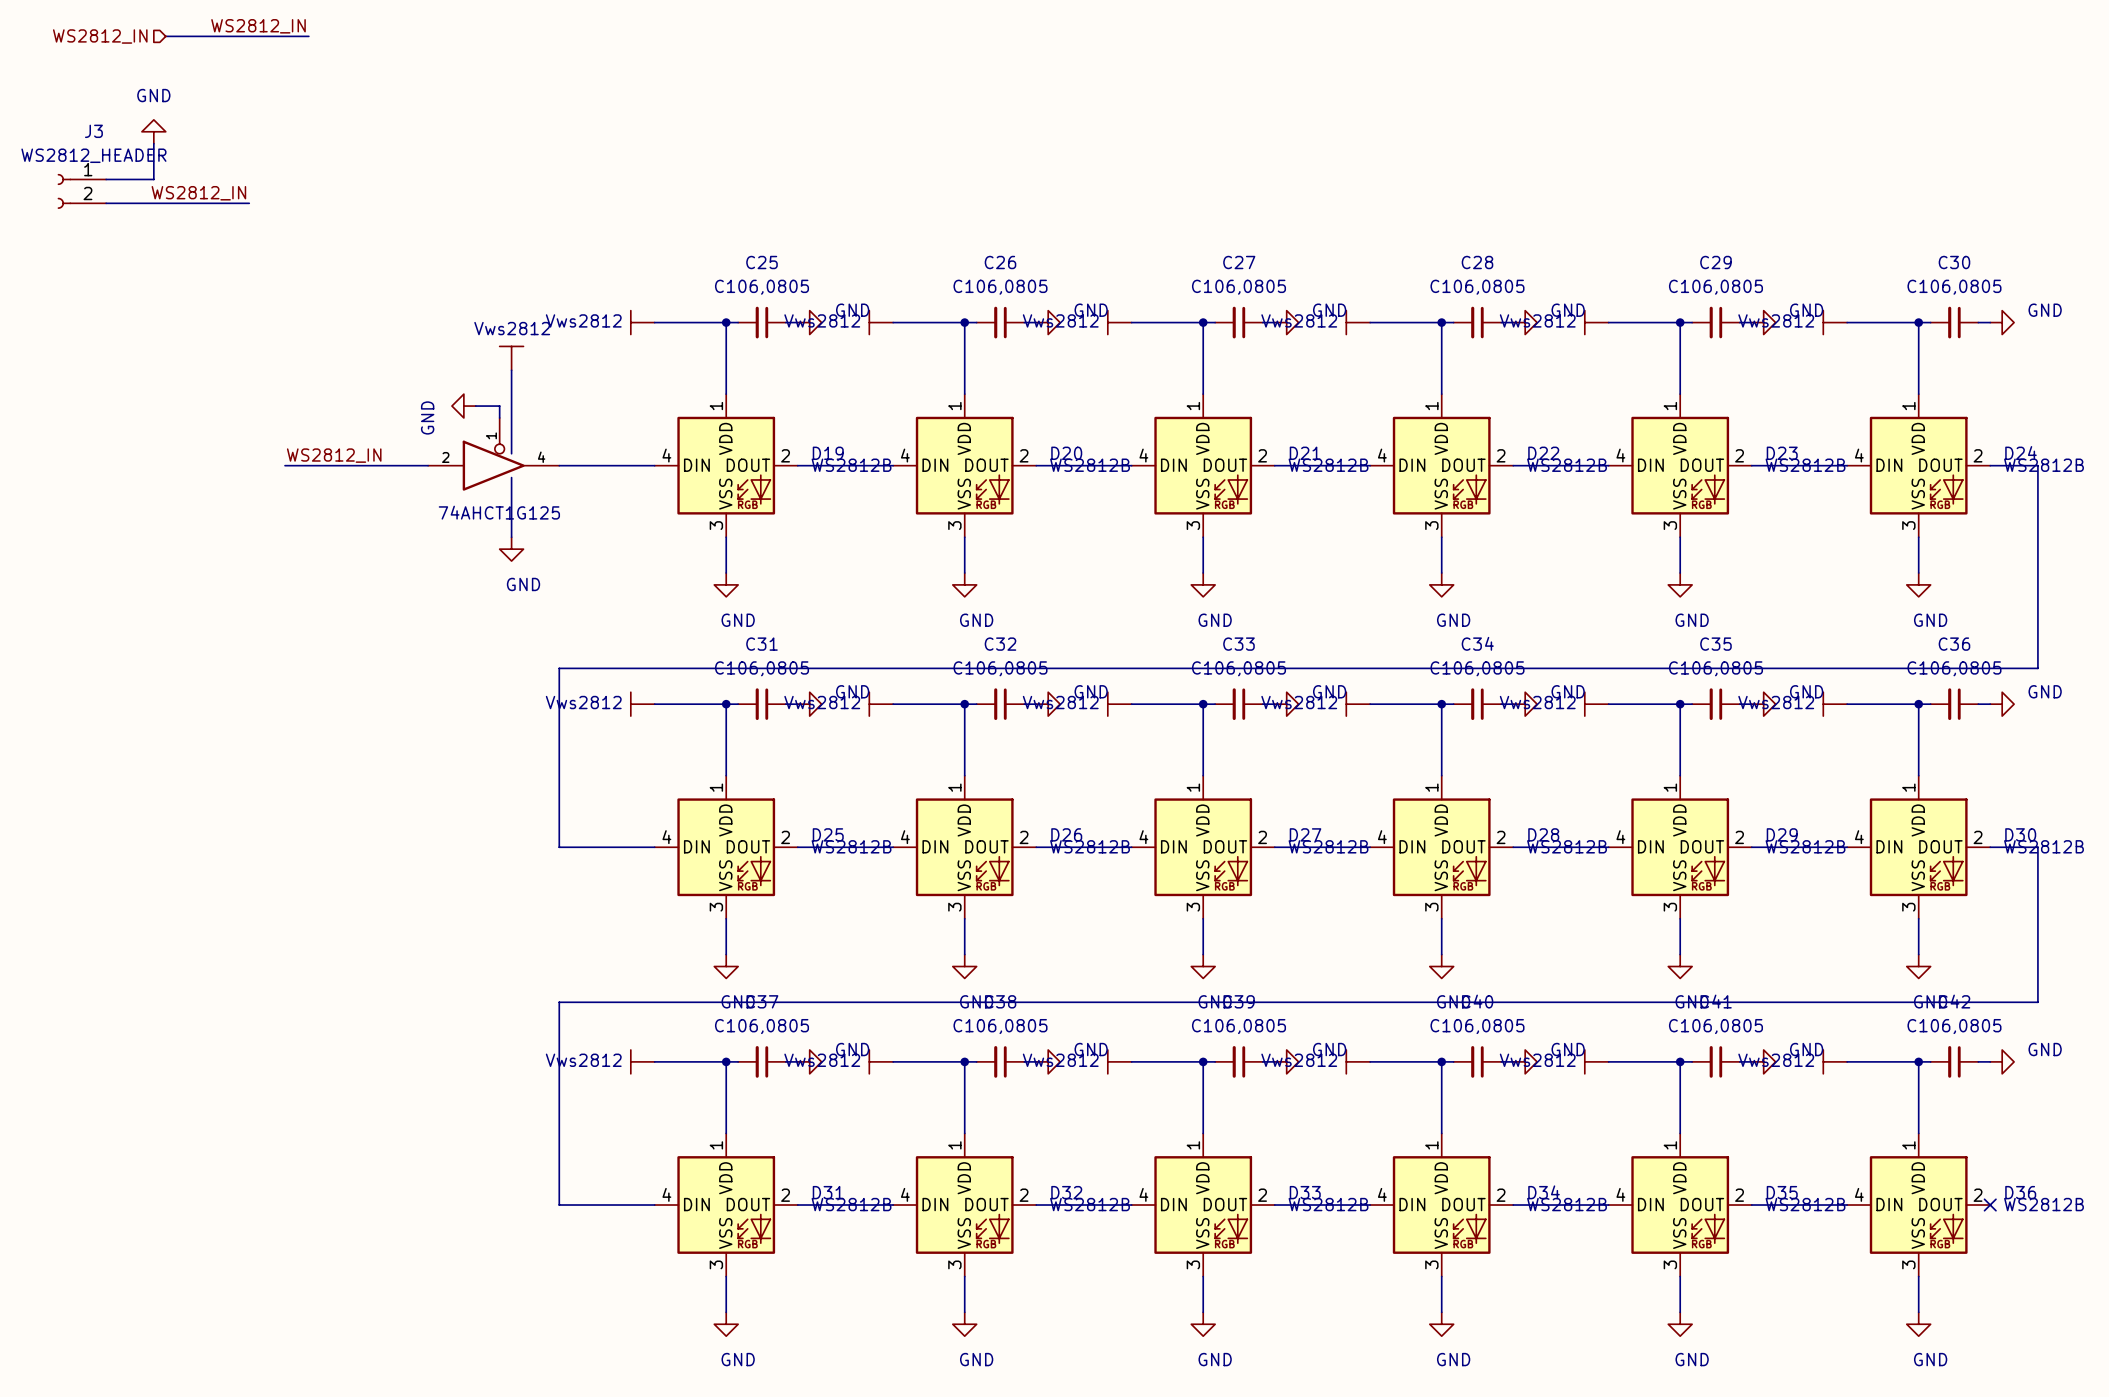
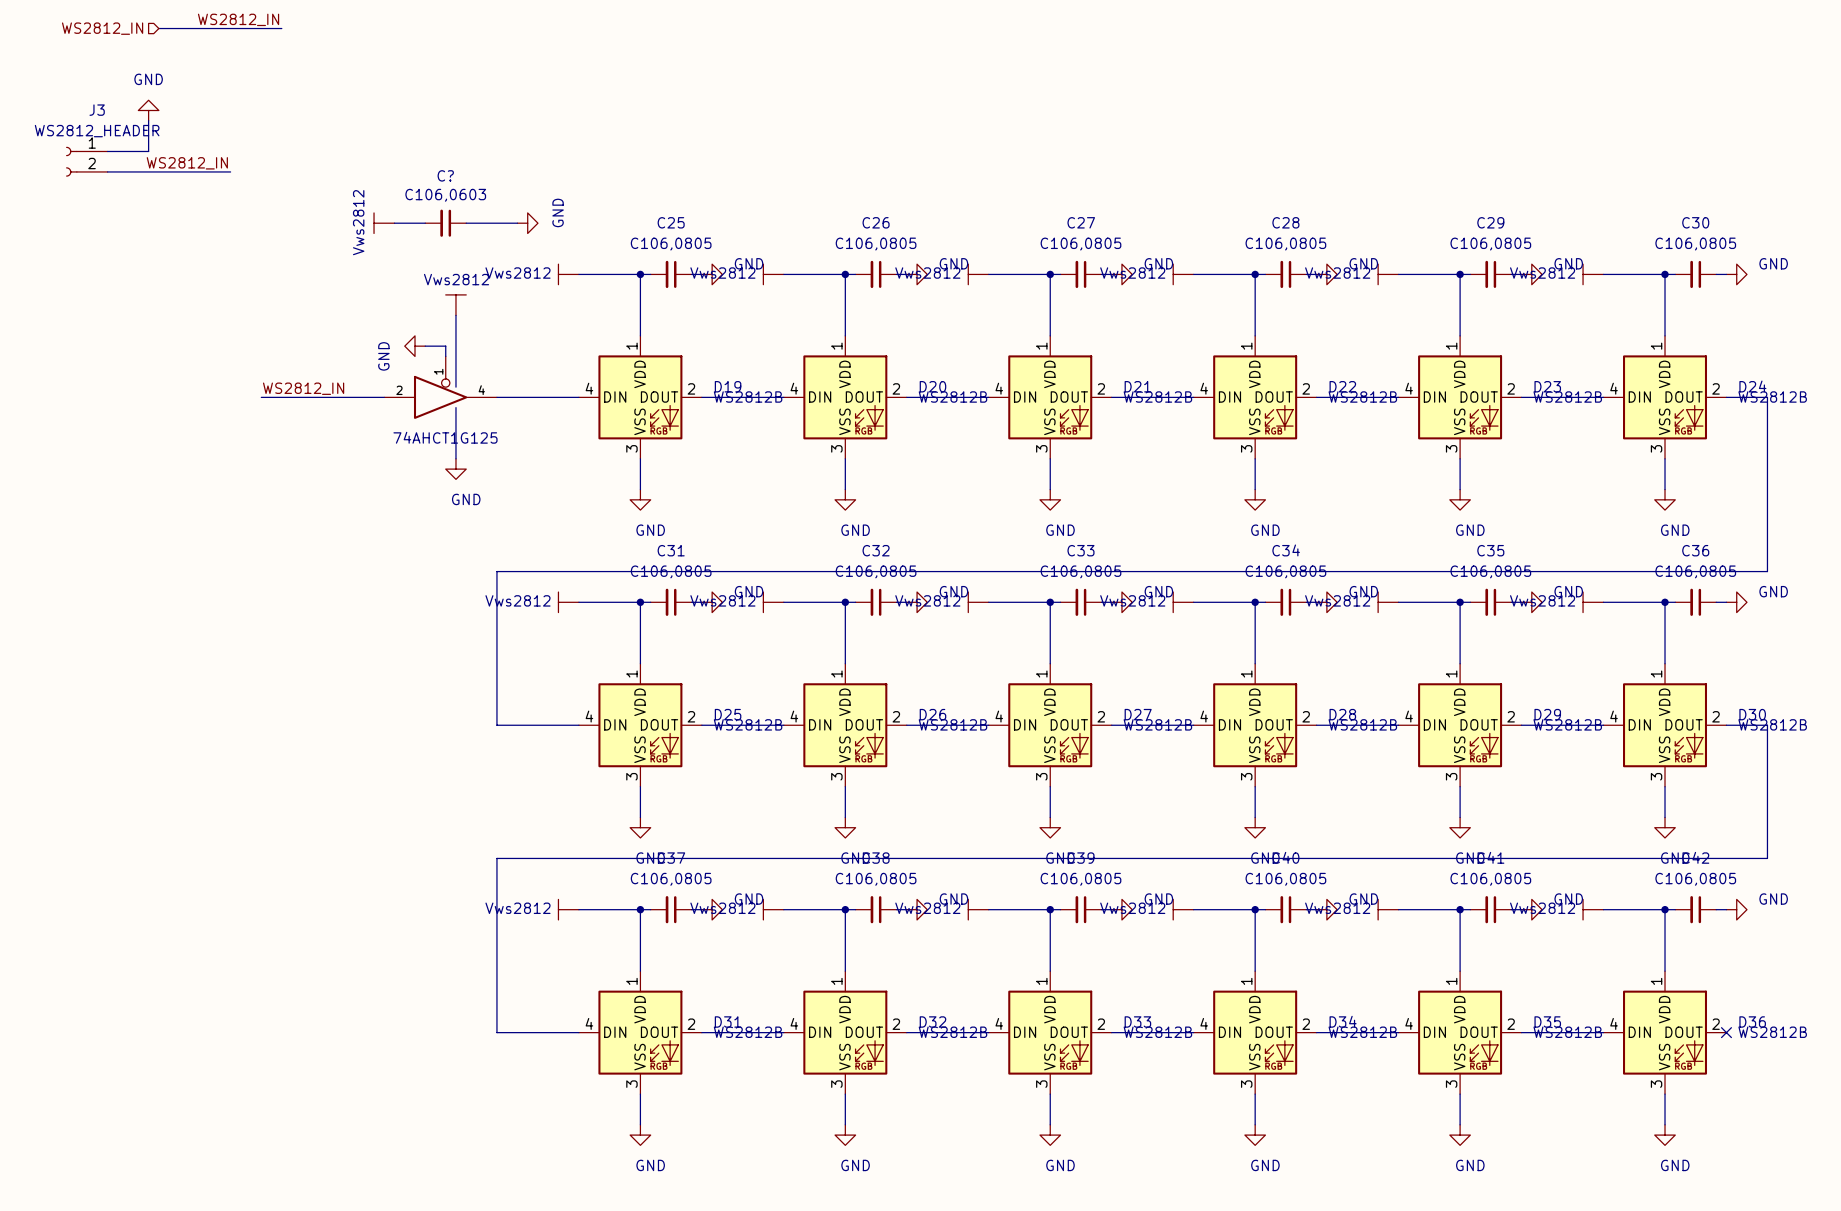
power symbol: none -> Vws2812 (384, 223)
wire: none -> (394, 223) (425, 223)
C?: none -> C106,0603 (445, 223)
wire: none -> (466, 223) (517, 223)
power symbol: none -> GND (527, 223)

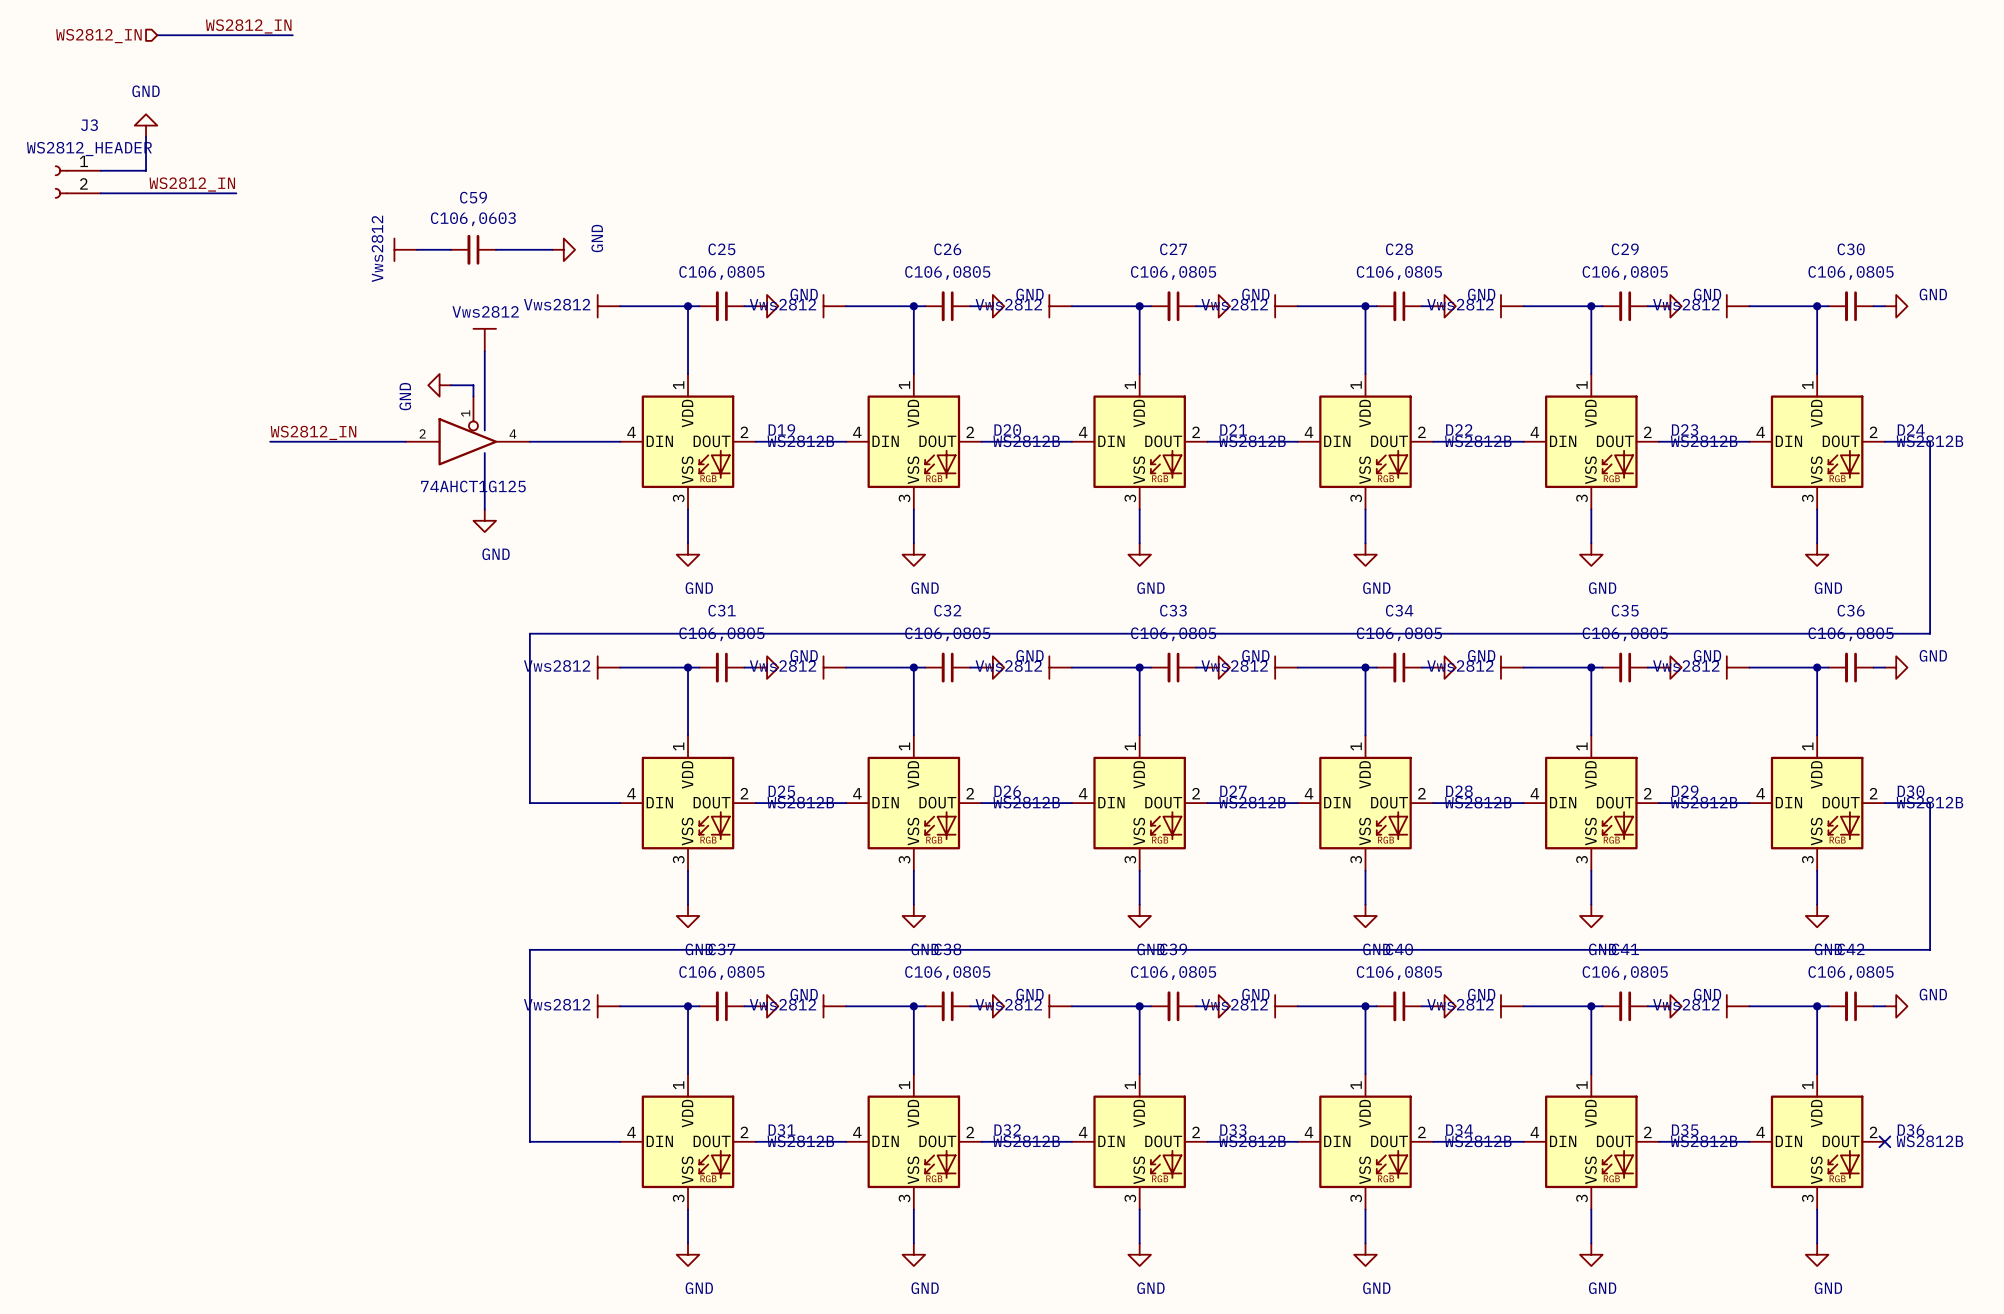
C? name: C? (445, 175) -> C59 (473, 197)

